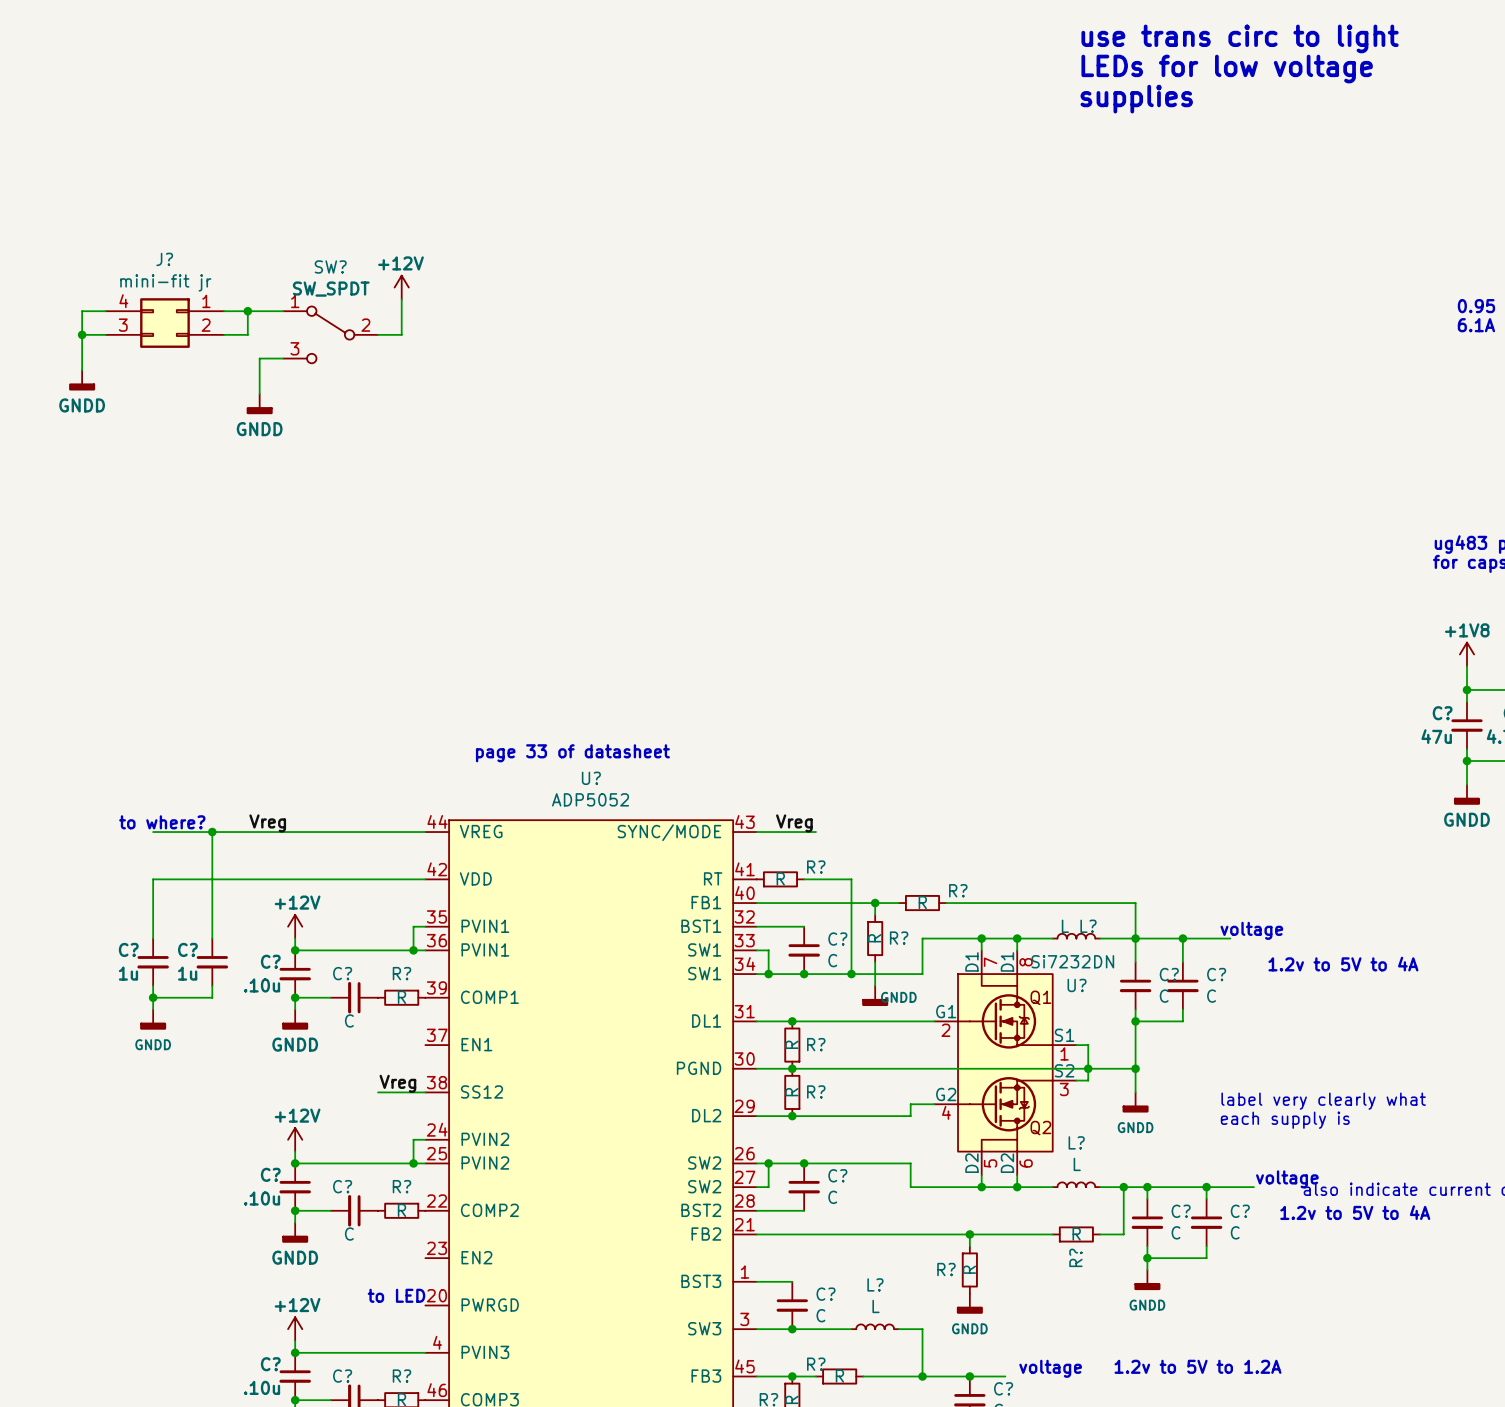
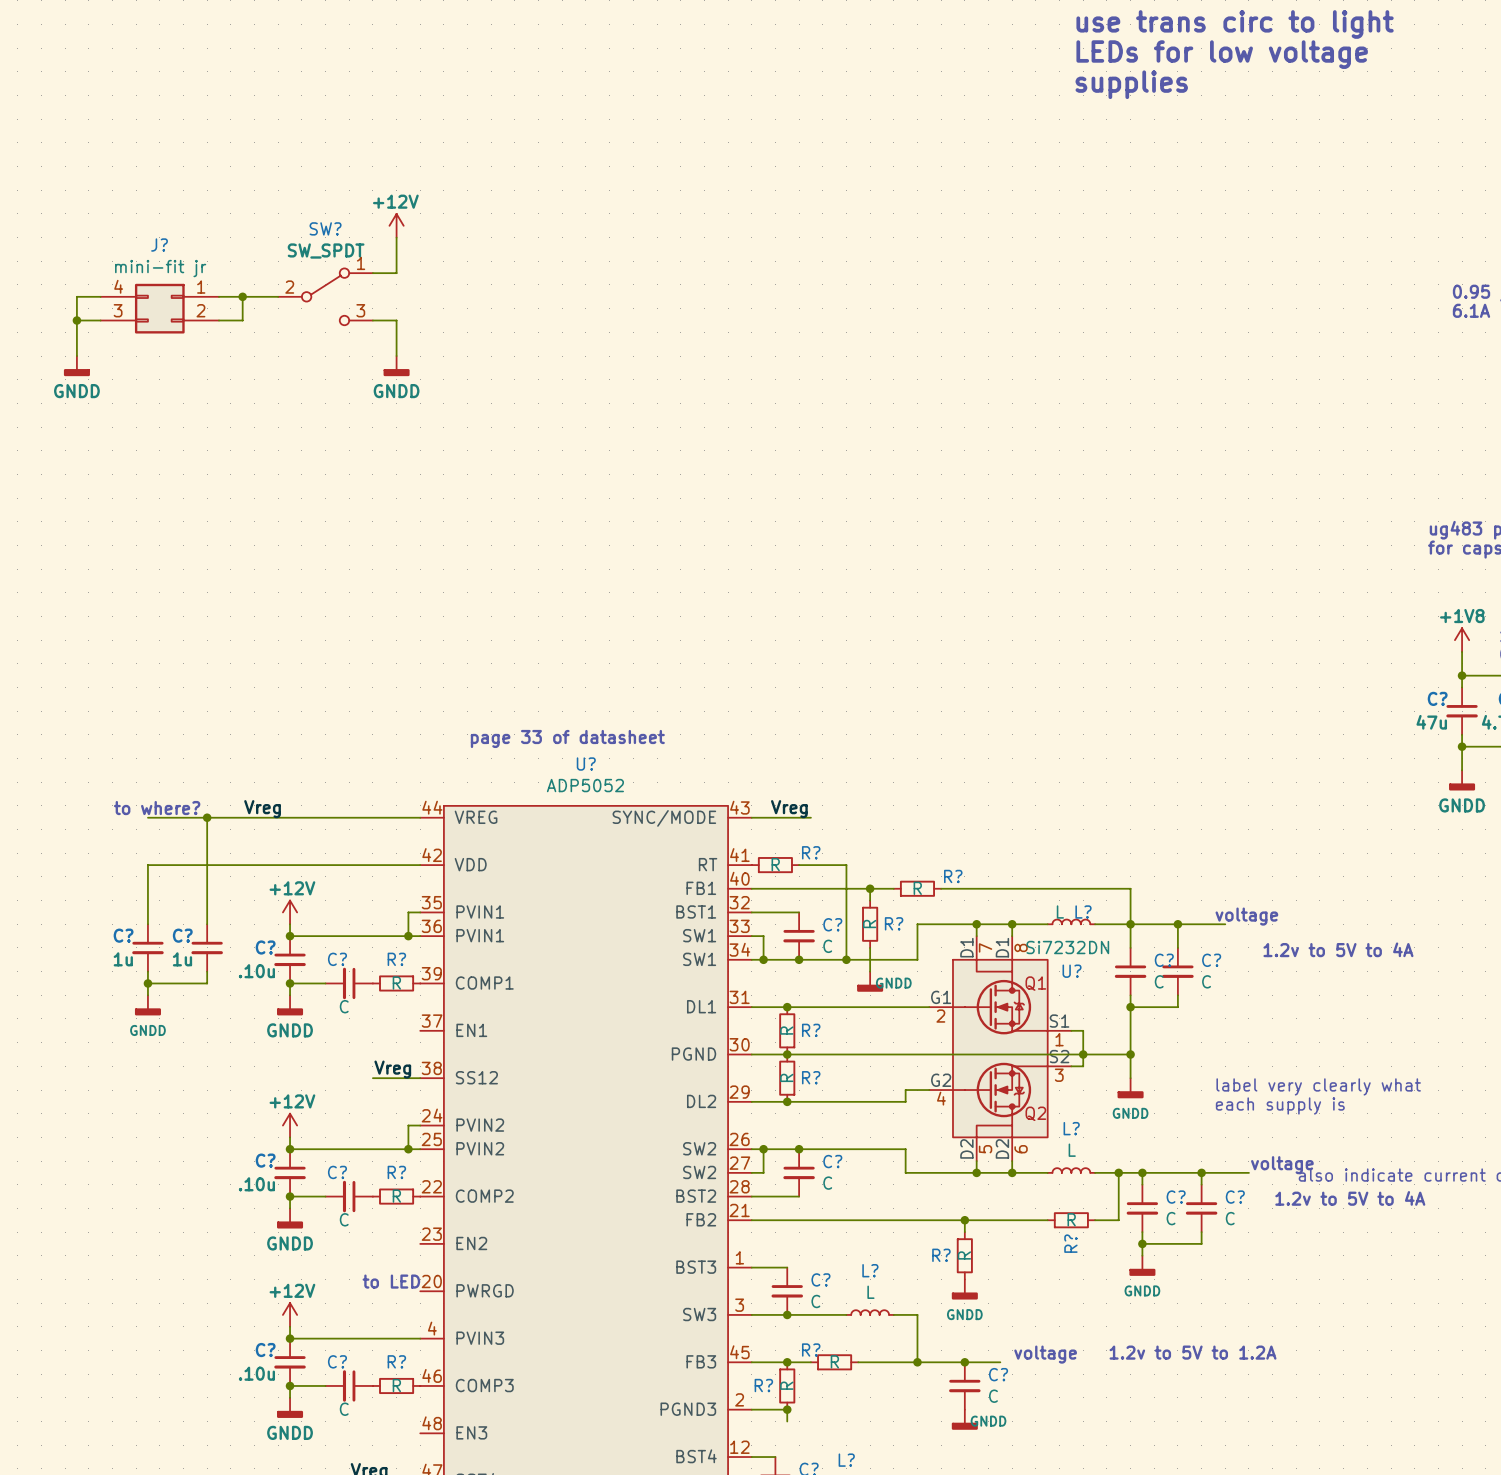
wire: none -> (396, 237) (396, 273) (372, 273)
power symbol position: +12V (401, 287) -> +12V (396, 225)
wire: (401, 299) (401, 334) -> (396, 356) (396, 320)
SW?: none -> SW_SPDT (325, 296)
SW?: SW_SPDT (330, 334) -> none
wire: (283, 358) (259, 358) (259, 394) -> none
power symbol position: GNDD (259, 404) -> GNDD (396, 366)

